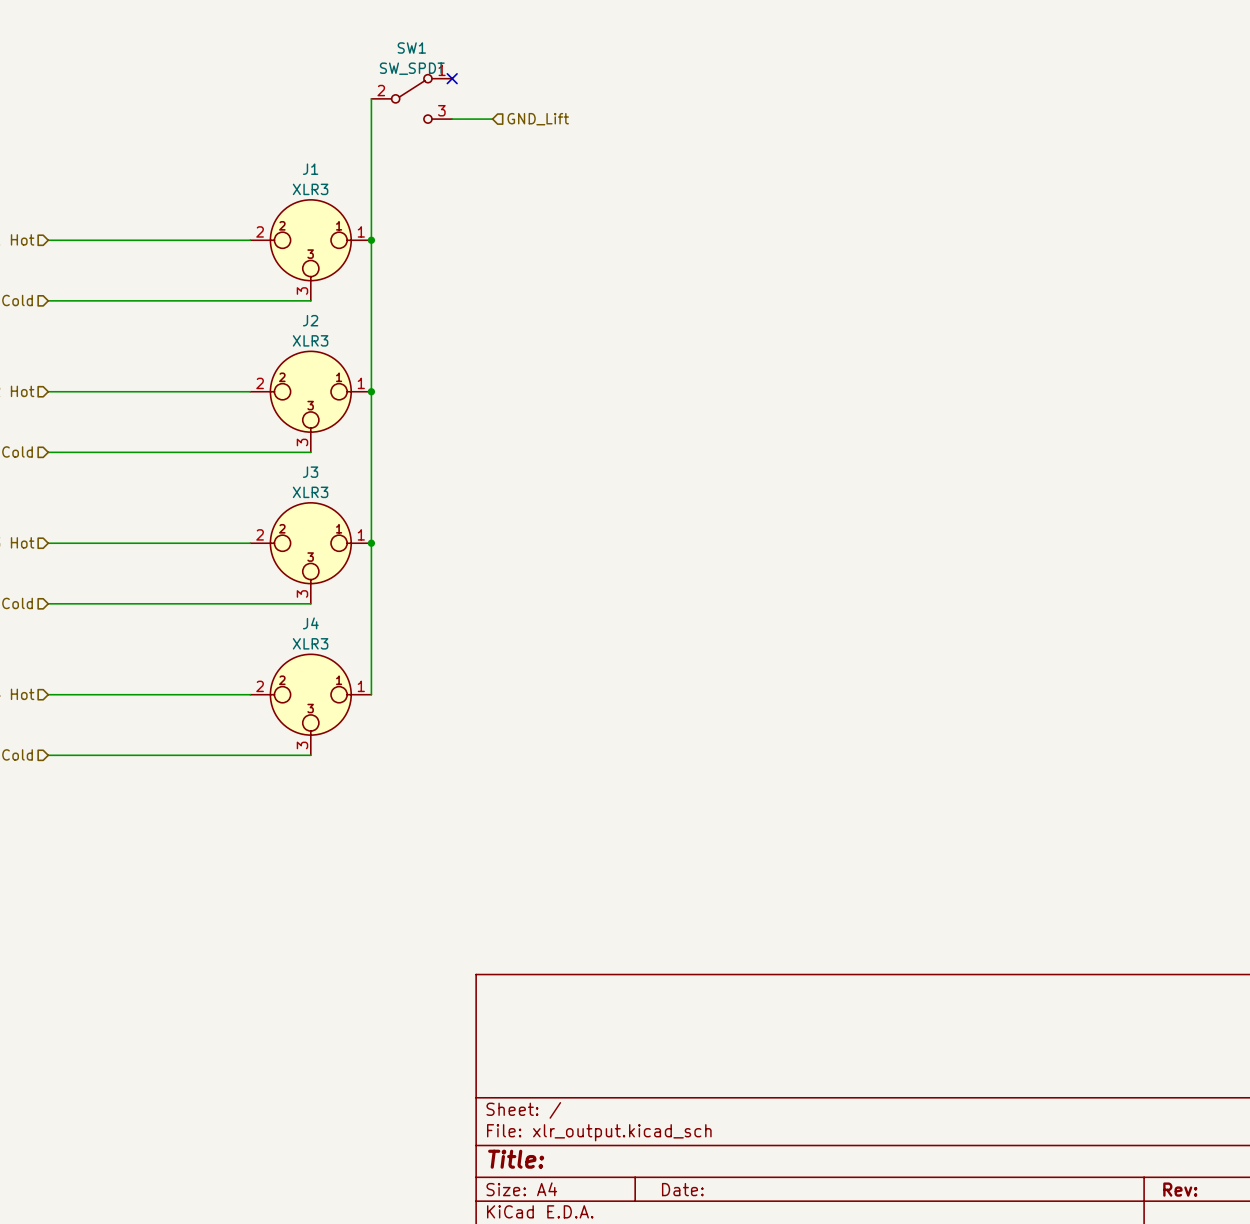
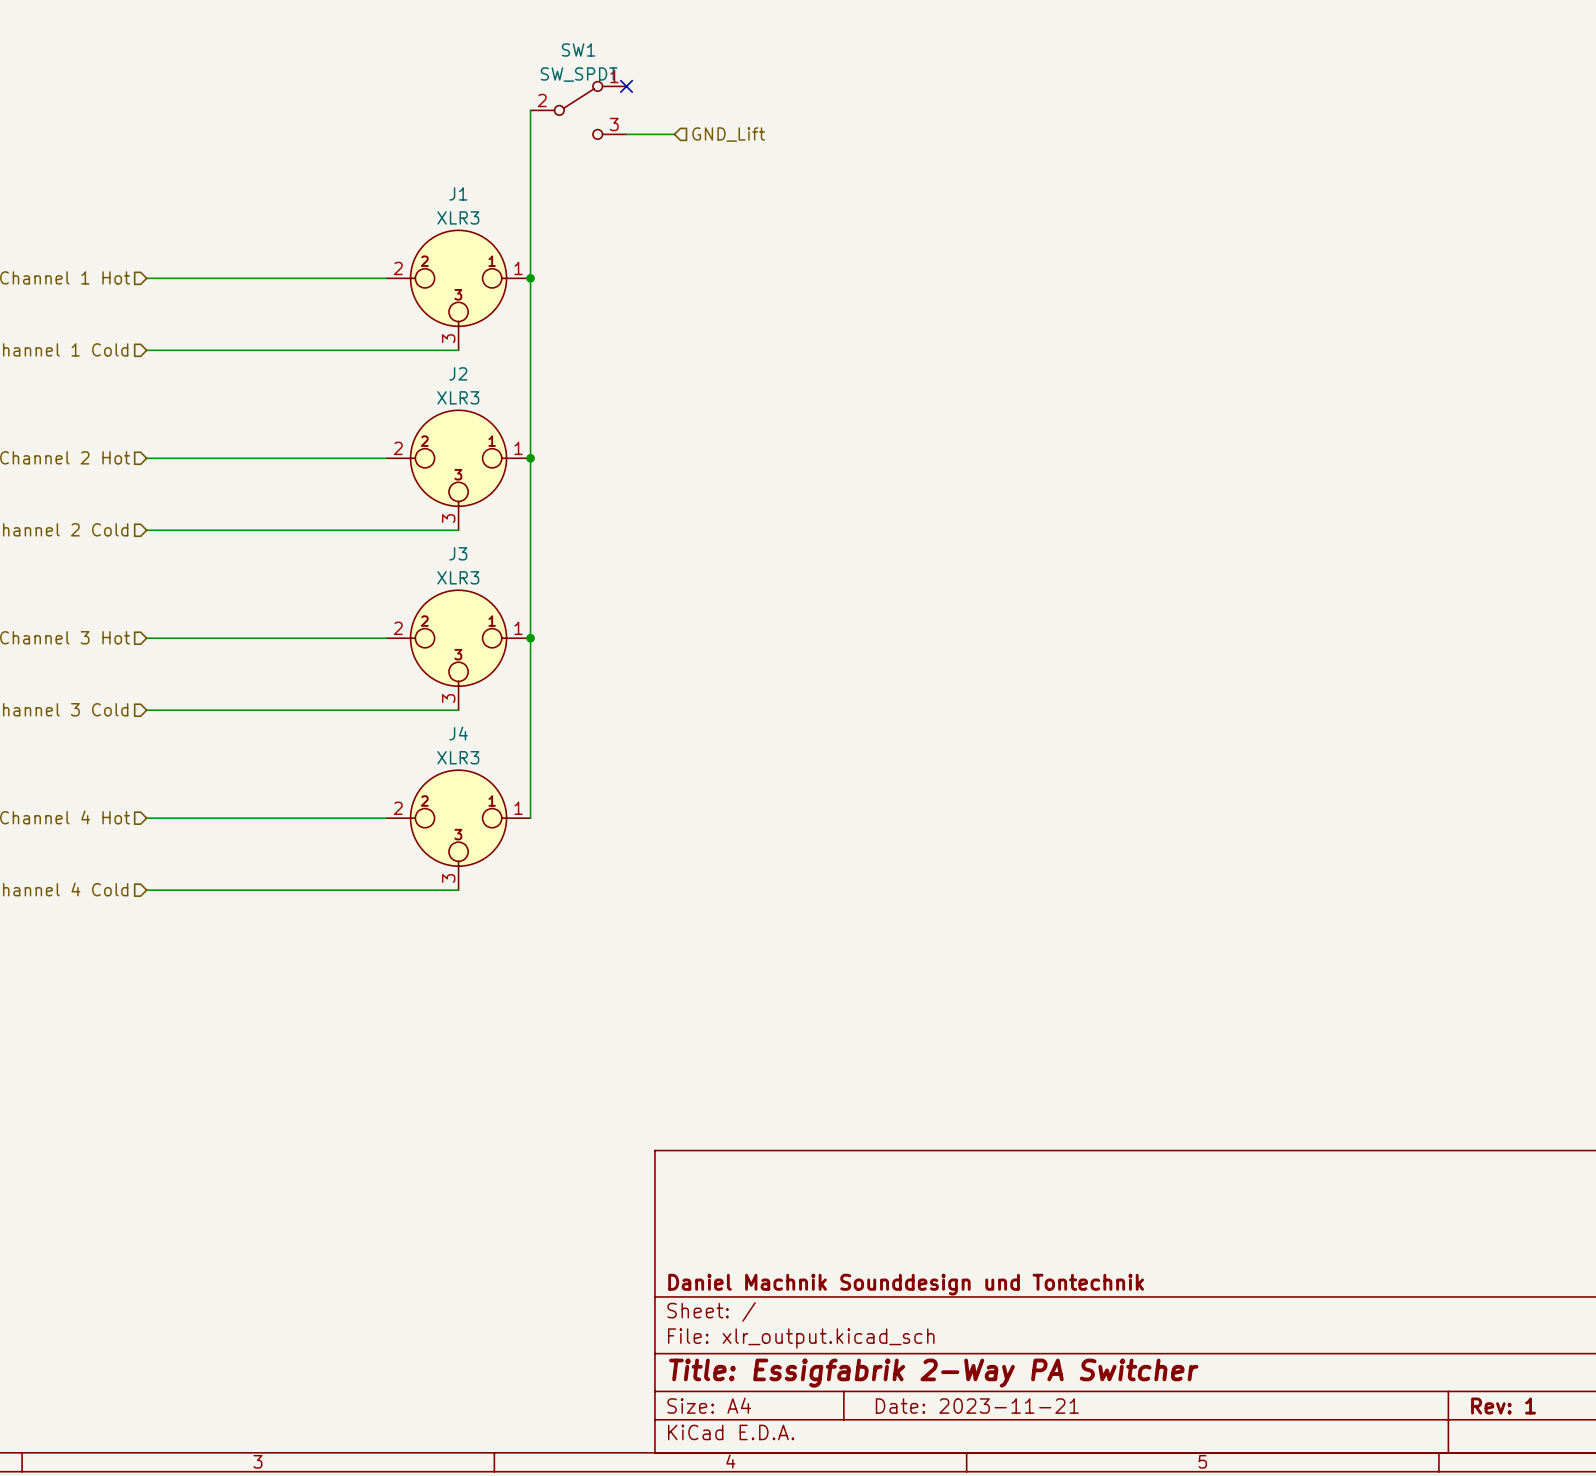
title block: none -> Daniel Machnik Sounddesign und Tontechnik (906, 1284)
title block: Title: (516, 1159) -> Title: Essigfabrik 2-Way PA Switcher (933, 1373)
title block: Date: (682, 1189) -> Date: 2023-11-21 (977, 1406)
title block: Rev: (1180, 1189) -> Rev: 1 (1503, 1406)

